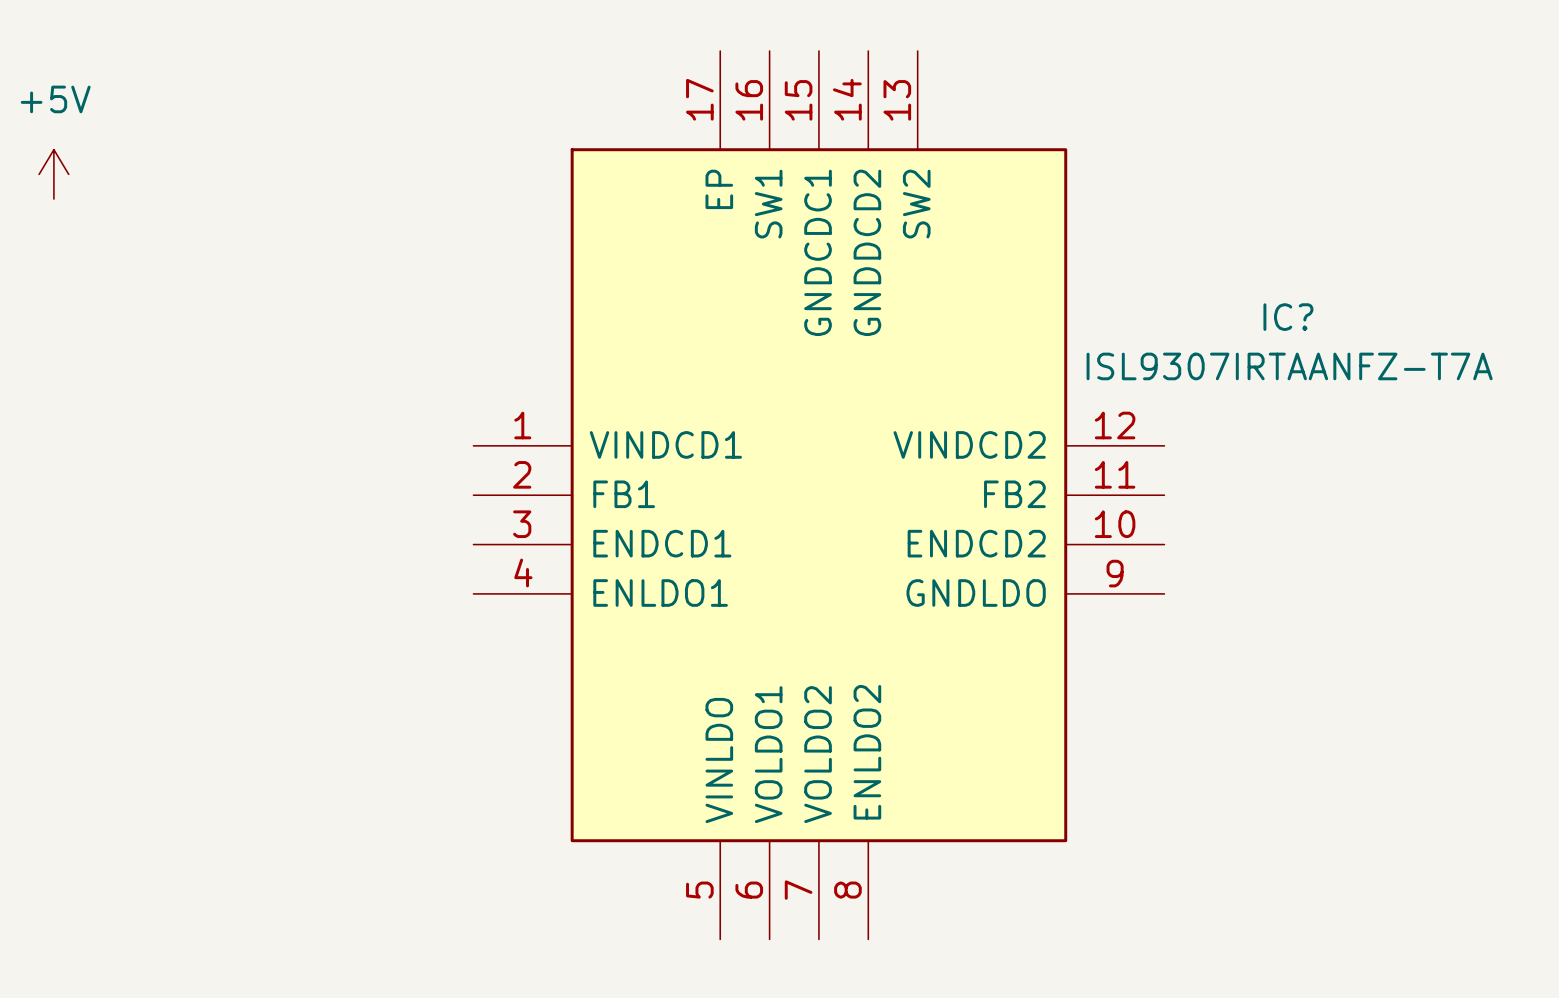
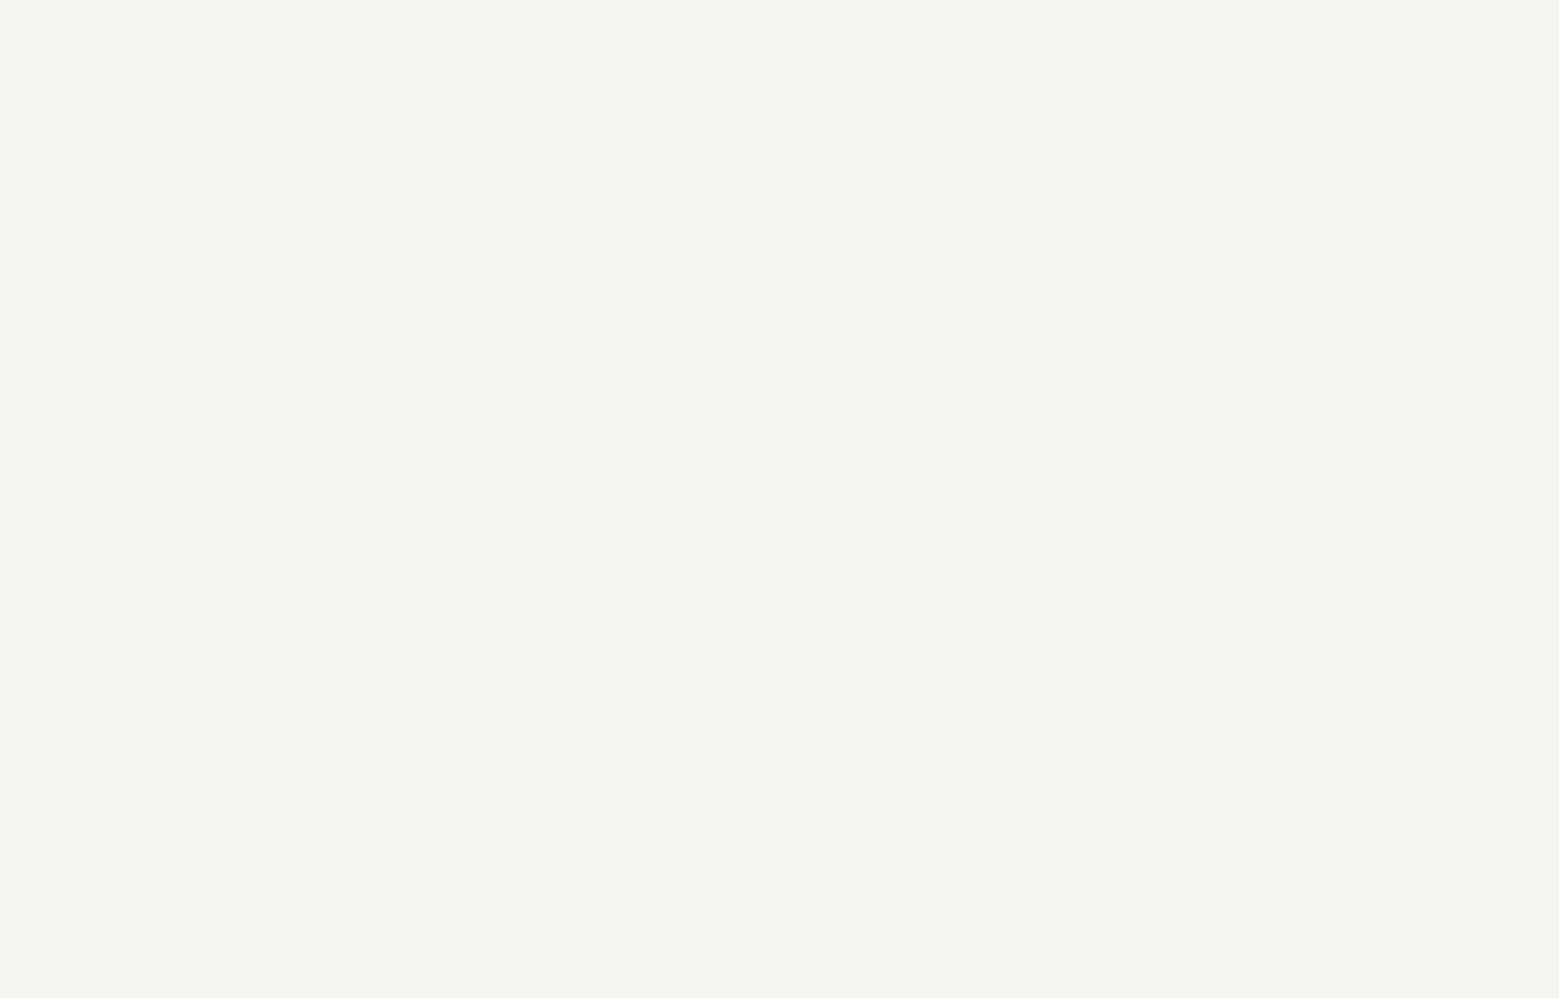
power symbol: +5V (53, 174) -> none
IC?: ISL9307IRTAANFZ-T7A (818, 495) -> none

